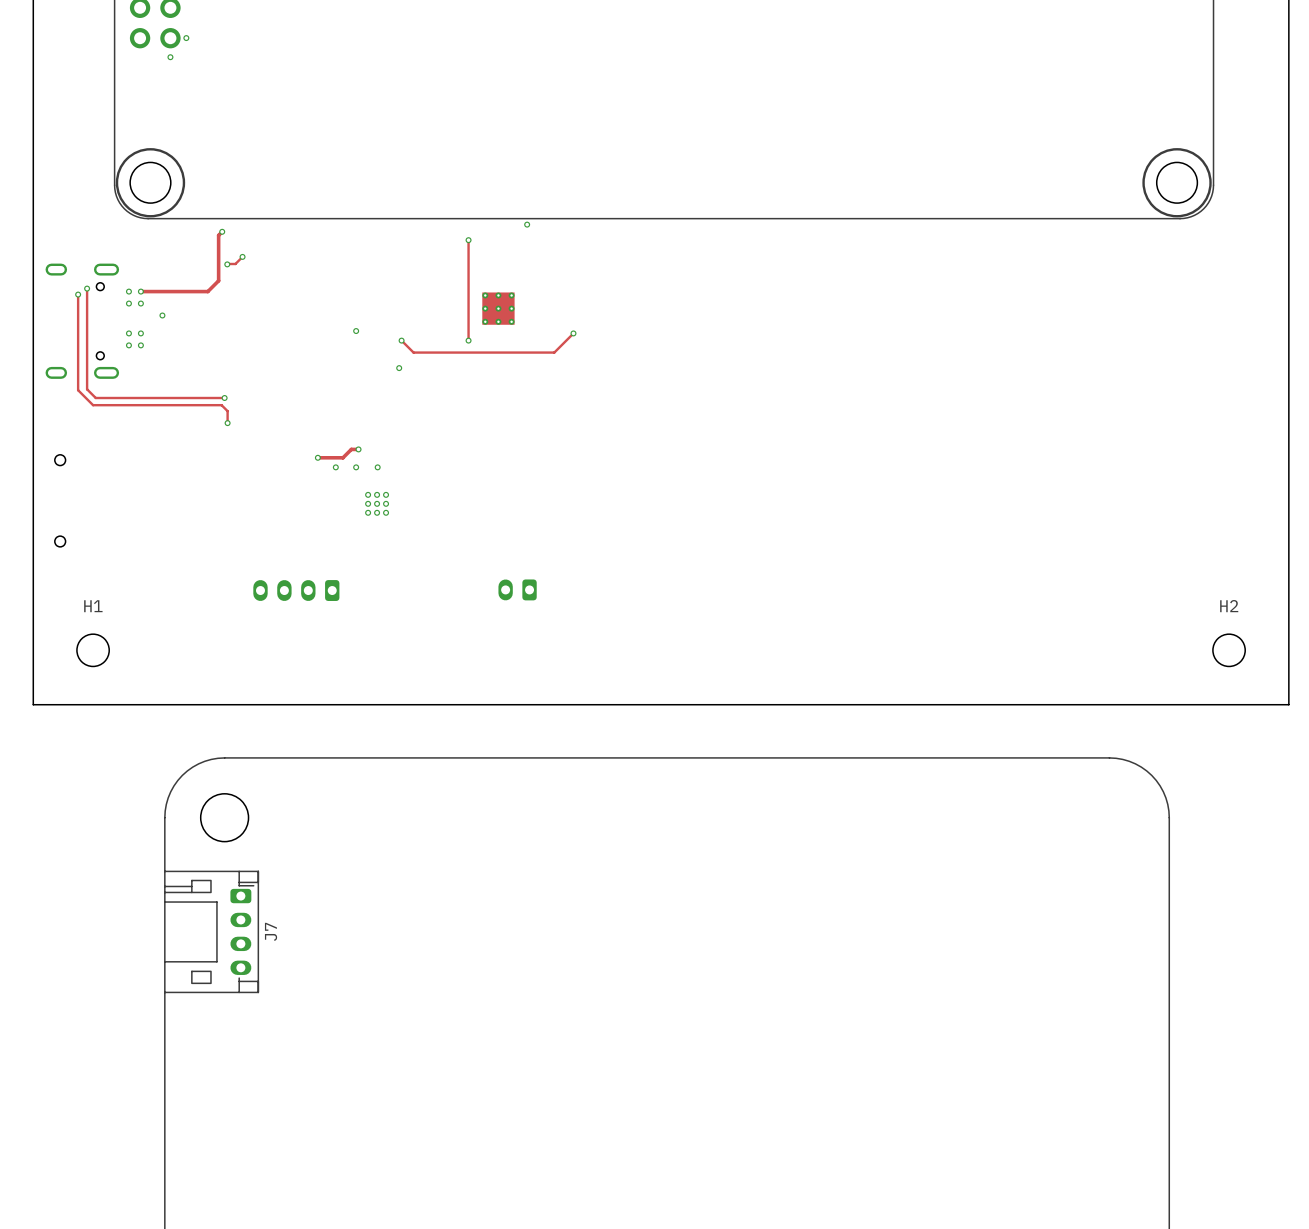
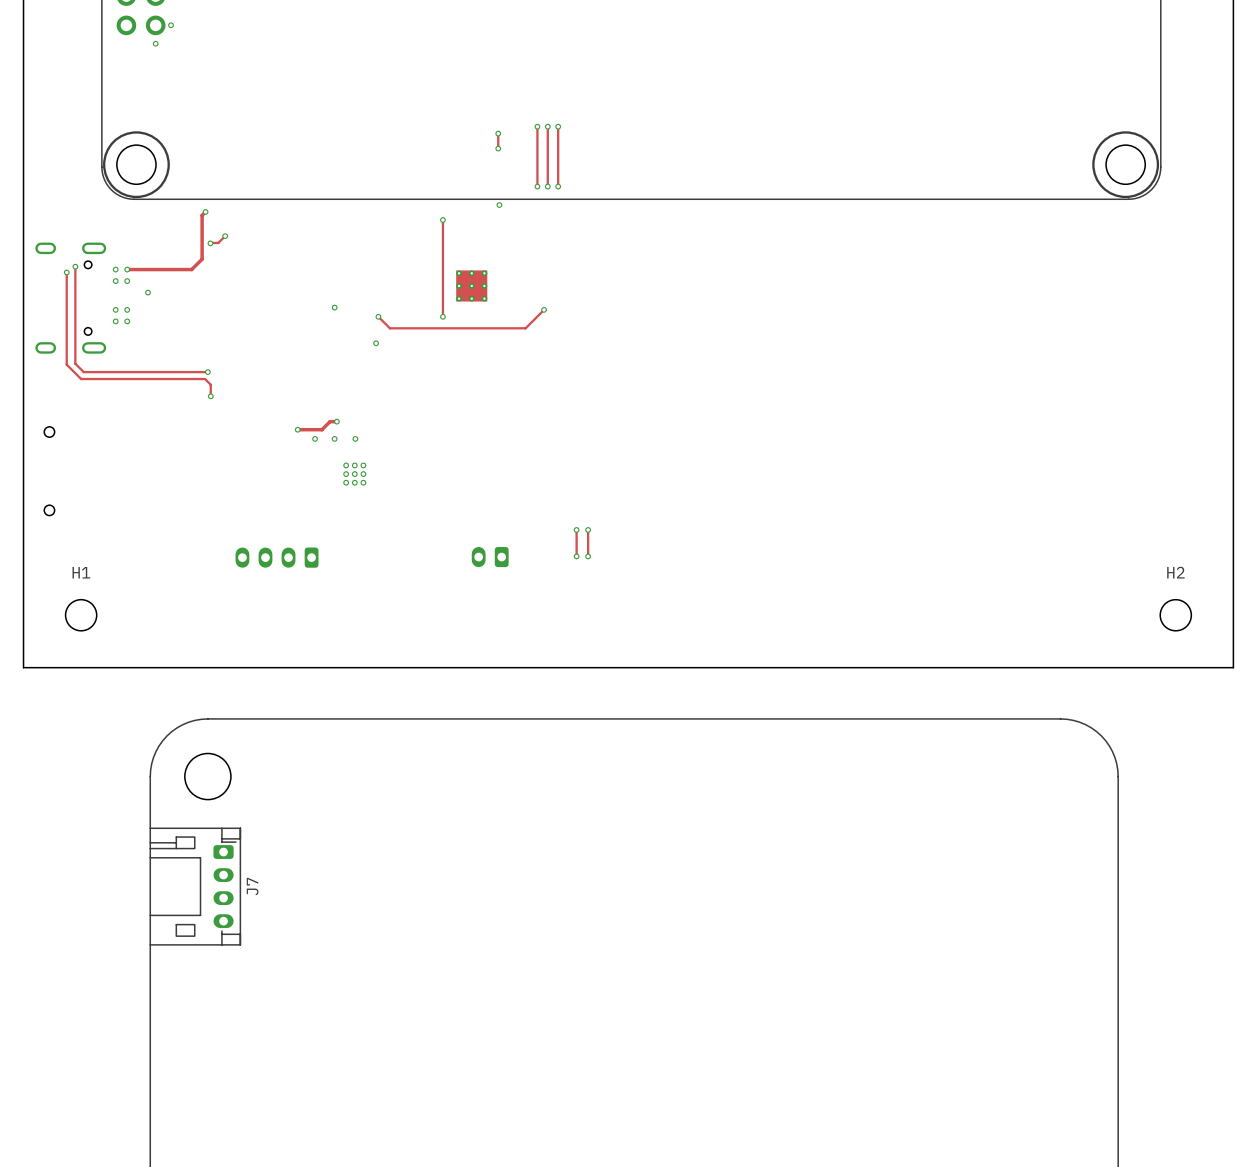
track: none -> (537, 126) (537, 186)
via: none -> (537, 126)
track: none -> (547, 126) (547, 186)
via: none -> (547, 126)
track: none -> (558, 126) (558, 186)
via: none -> (558, 126)
track: none -> (498, 133) (498, 148)
via: none -> (498, 133)
via: none -> (498, 148)
via: none -> (537, 186)
via: none -> (547, 186)
via: none -> (558, 186)
track: none -> (576, 529) (576, 556)
via: none -> (576, 529)
track: none -> (588, 529) (588, 556)
via: none -> (588, 529)
via: none -> (576, 556)
via: none -> (588, 556)

